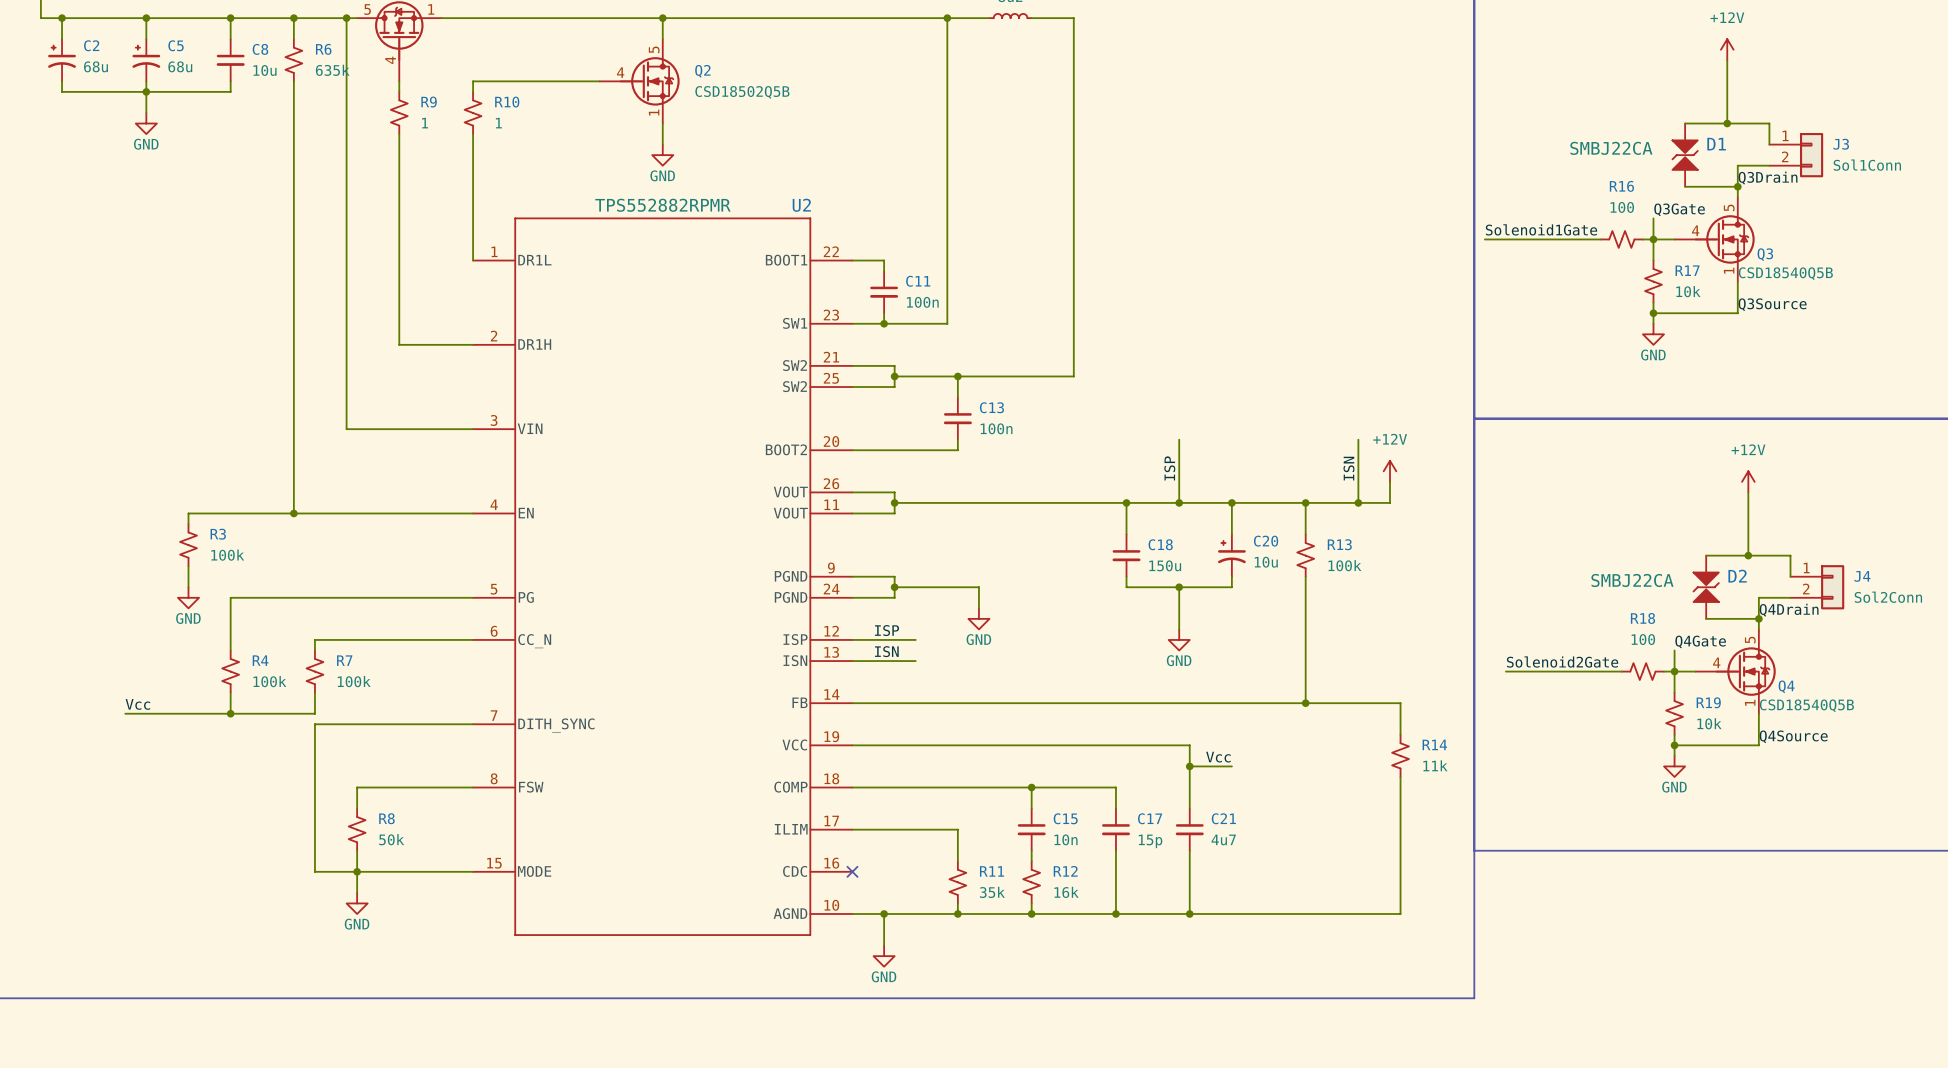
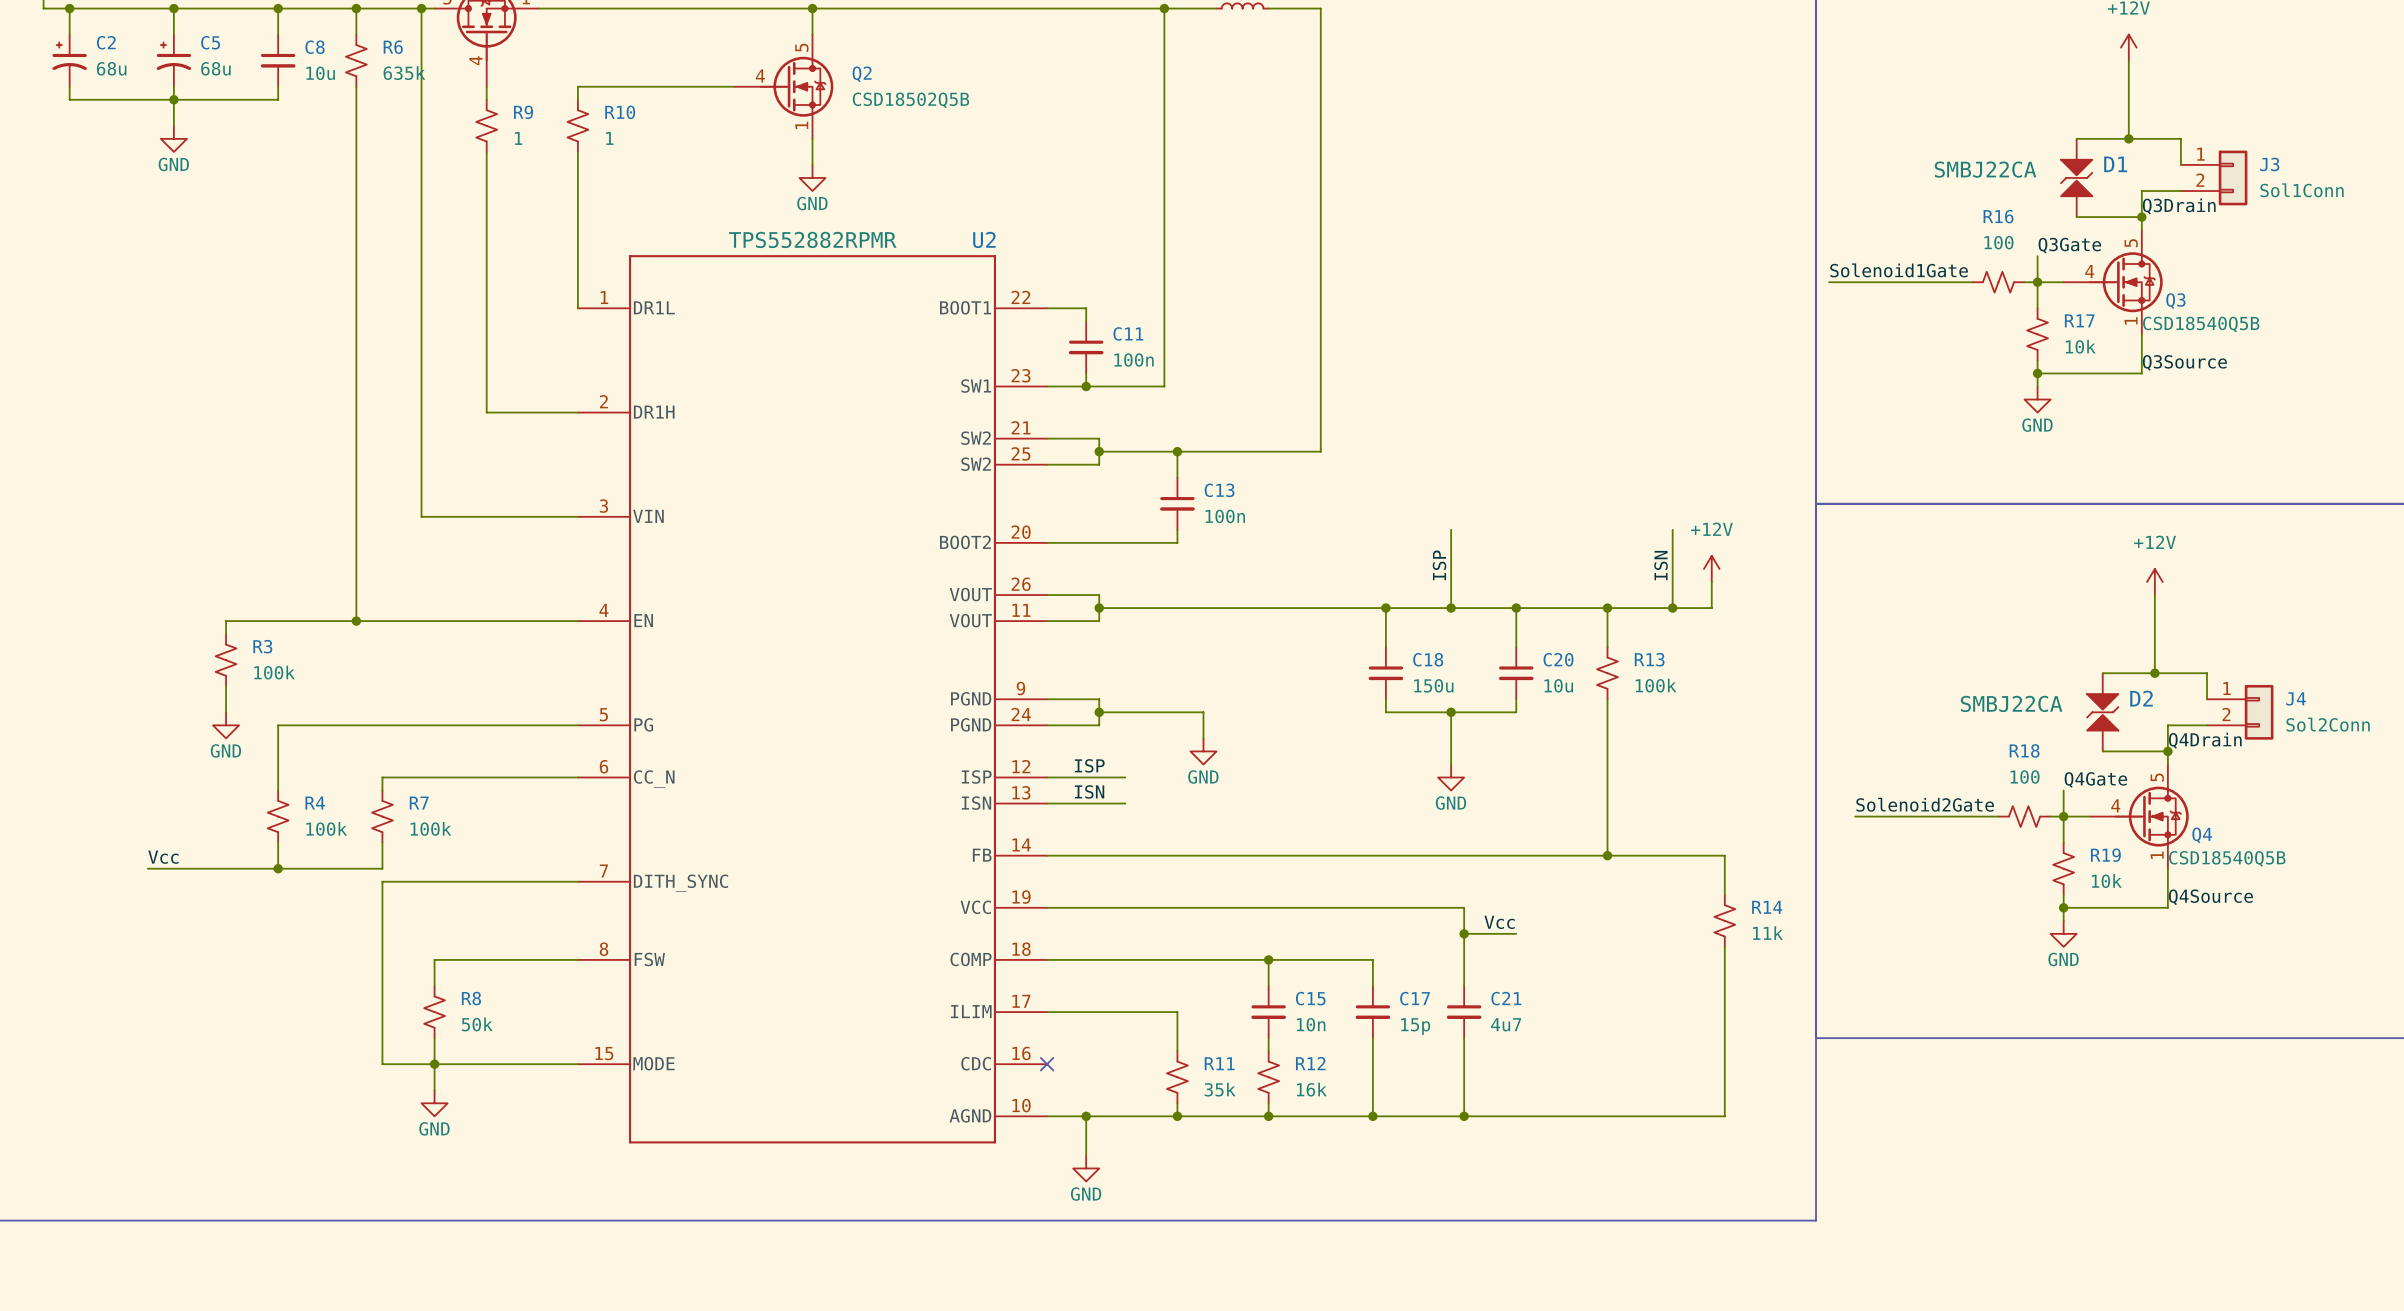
C20 symbol: [1217, 534, 1246, 577] -> [1498, 647, 1534, 700]

